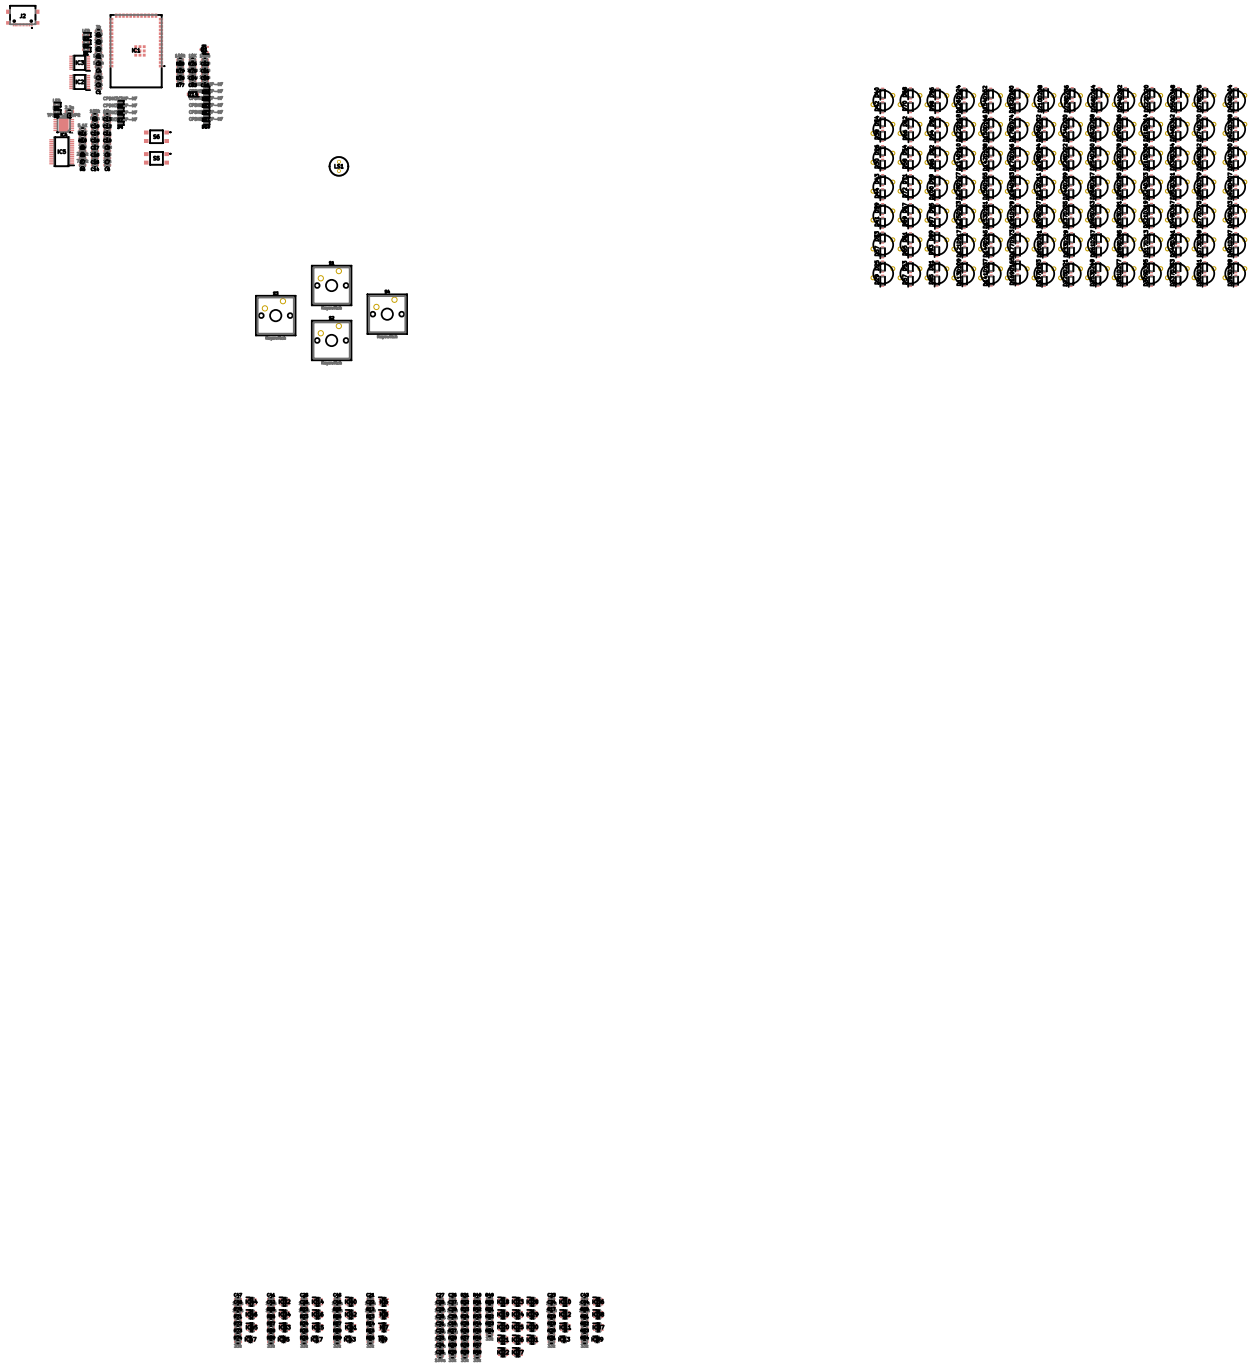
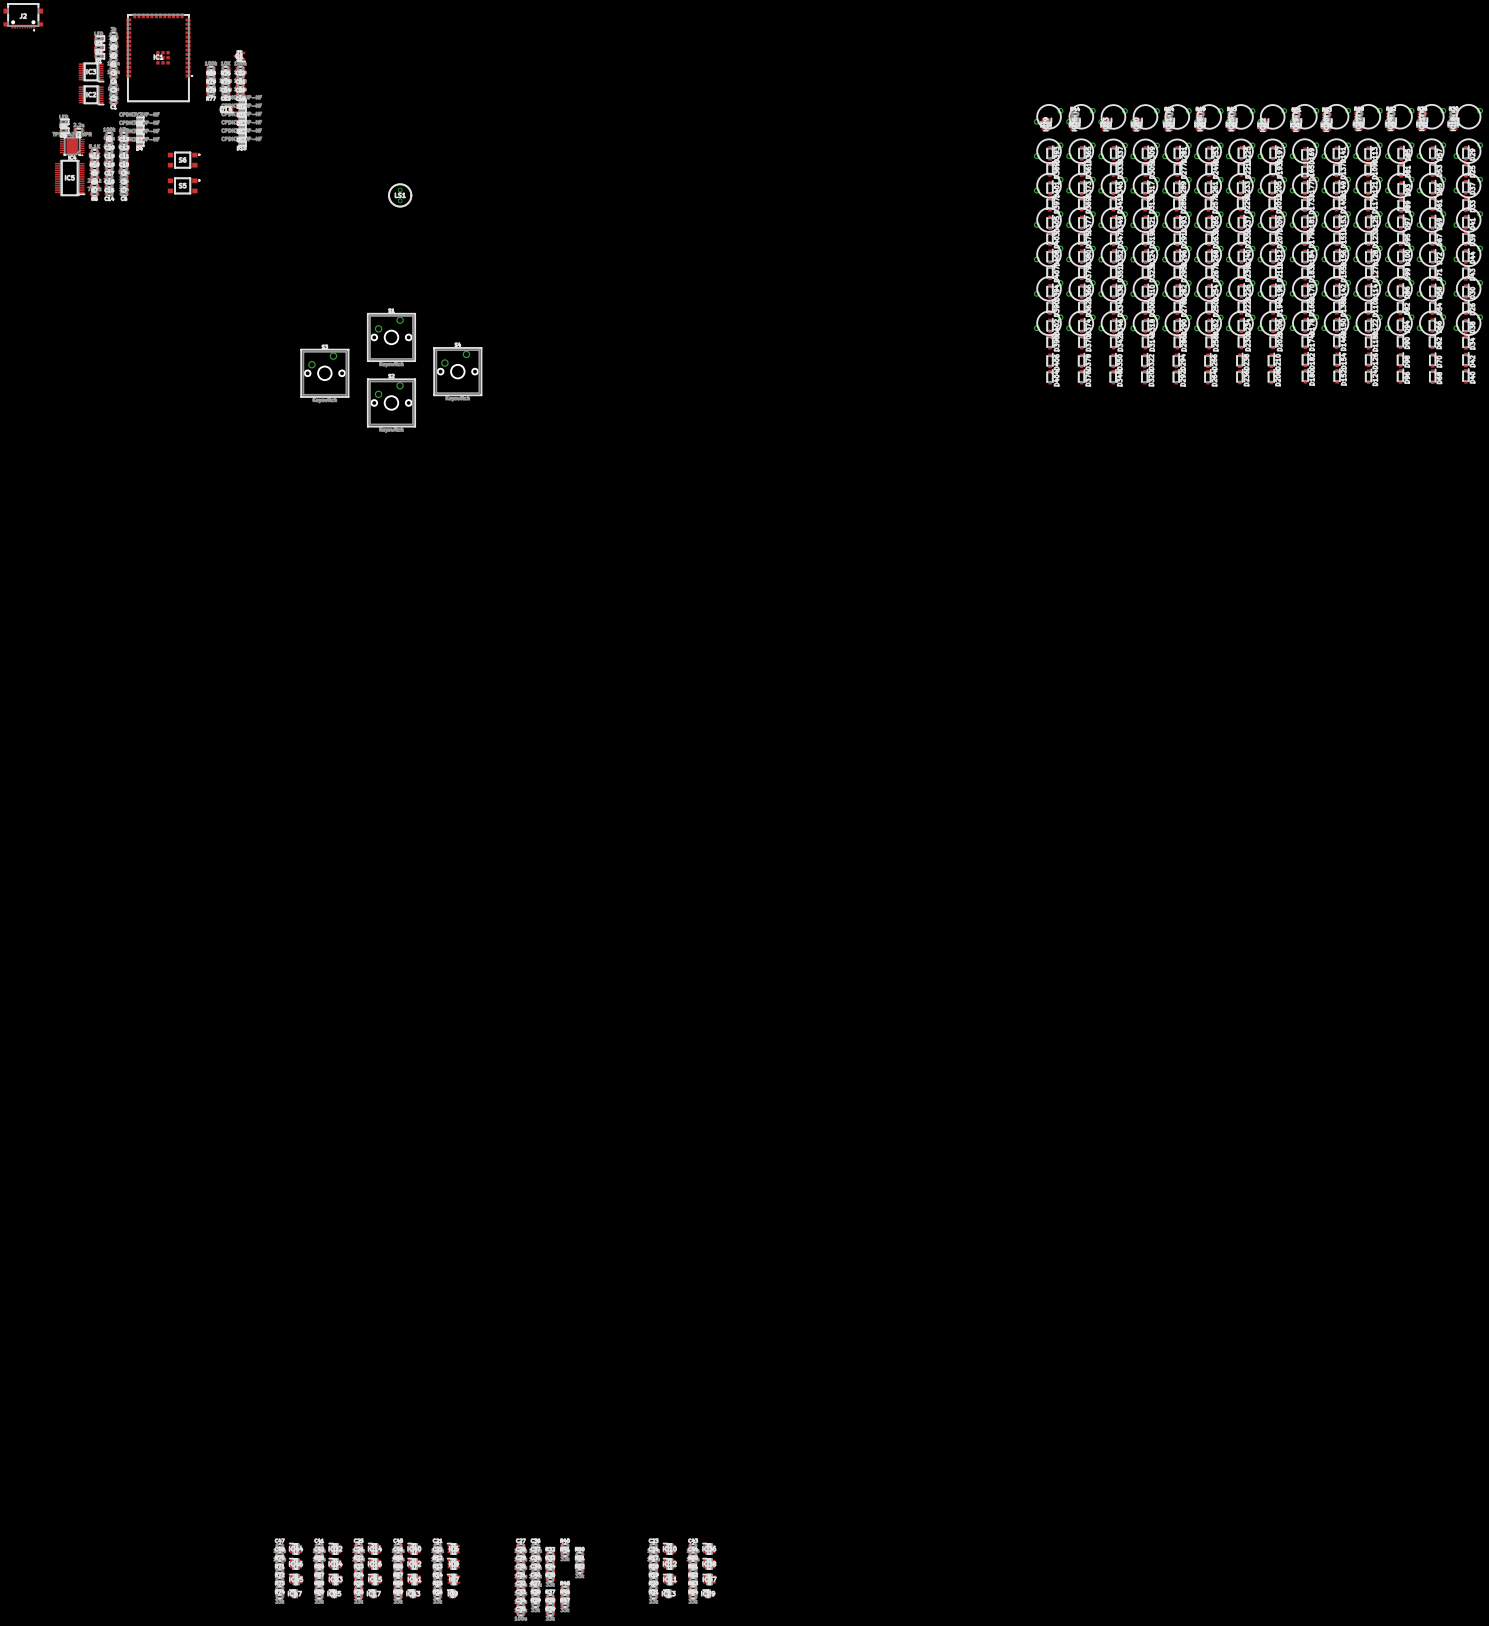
part rotation: 0° (882, 93) -> 180° (1465, 376)
part position: (882, 93) -> (1465, 376)
part rotation: 0° (910, 93) -> 180° (1432, 376)
part position: (910, 93) -> (1432, 376)
part rotation: 0° (937, 93) -> 180° (1400, 376)
part position: (937, 93) -> (1400, 376)
part rotation: 0° (964, 93) -> 180° (1368, 376)
part position: (964, 93) -> (1368, 376)
part rotation: 0° (990, 93) -> 180° (1337, 376)
part position: (990, 93) -> (1337, 376)
part rotation: 0° (1017, 93) -> 180° (1305, 376)
part position: (1017, 93) -> (1305, 376)
part rotation: 0° (1045, 93) -> 180° (1271, 376)
part position: (1045, 93) -> (1271, 376)
part rotation: 0° (1072, 93) -> 180° (1239, 376)
part position: (1072, 93) -> (1239, 376)
part rotation: 0° (1099, 93) -> 180° (1207, 377)
part position: (1099, 93) -> (1207, 377)
part rotation: 0° (1125, 93) -> 180° (1176, 377)
part position: (1125, 93) -> (1176, 377)
part rotation: 0° (1152, 93) -> 180° (1144, 377)
part position: (1152, 93) -> (1144, 377)
part rotation: 0° (1178, 93) -> 180° (1113, 377)
part position: (1178, 93) -> (1113, 377)
part rotation: 0° (1205, 93) -> 180° (1081, 377)
part position: (1205, 93) -> (1081, 377)
part rotation: 0° (1235, 93) -> 180° (1050, 377)
part position: (1235, 93) -> (1050, 377)
part rotation: 0° (1045, 106) -> 180° (1271, 360)
part position: (1045, 106) -> (1271, 360)
part rotation: 0° (1072, 106) -> 180° (1239, 360)
part position: (1072, 106) -> (1239, 360)
part rotation: 0° (1099, 106) -> 180° (1207, 360)
part position: (1099, 106) -> (1207, 360)
part rotation: 0° (1125, 106) -> 180° (1176, 360)
part position: (1125, 106) -> (1176, 360)
part rotation: 0° (1152, 106) -> 180° (1144, 360)
part position: (1152, 106) -> (1144, 360)
part rotation: 0° (1178, 106) -> 180° (1113, 360)
part position: (1178, 106) -> (1113, 360)
part rotation: 0° (1205, 106) -> 180° (1081, 360)
part position: (1205, 106) -> (1081, 360)
part rotation: 0° (1235, 106) -> 180° (1050, 360)
part position: (1235, 106) -> (1050, 360)
part rotation: 0° (882, 107) -> 180° (1465, 359)
part position: (882, 107) -> (1465, 359)
part rotation: 0° (910, 107) -> 180° (1432, 360)
part position: (910, 107) -> (1432, 360)
part rotation: 0° (937, 107) -> 180° (1400, 360)
part position: (937, 107) -> (1400, 360)
part rotation: 0° (964, 107) -> 180° (1368, 359)
part position: (964, 107) -> (1368, 359)
part rotation: 0° (990, 107) -> 180° (1337, 359)
part position: (990, 107) -> (1337, 359)
part rotation: 0° (1017, 107) -> 180° (1305, 359)
part position: (1017, 107) -> (1305, 359)
part rotation: 0° (882, 122) -> 180° (1465, 342)
part position: (882, 122) -> (1465, 342)
part rotation: 0° (910, 122) -> 180° (1432, 341)
part position: (910, 122) -> (1432, 341)
part rotation: 0° (937, 122) -> 180° (1400, 341)
part position: (937, 122) -> (1400, 341)
part rotation: 0° (964, 122) -> 180° (1368, 342)
part position: (964, 122) -> (1368, 342)
part rotation: 0° (990, 122) -> 180° (1336, 341)
part position: (990, 122) -> (1336, 341)
part rotation: 0° (1017, 122) -> 180° (1305, 341)
part position: (1017, 122) -> (1305, 341)
part rotation: 0° (1044, 122) -> 180° (1273, 341)
part position: (1044, 122) -> (1273, 341)
part rotation: 0° (1071, 122) -> 180° (1241, 341)
part position: (1071, 122) -> (1241, 341)
part rotation: 0° (1098, 122) -> 180° (1209, 342)
part position: (1098, 122) -> (1209, 342)
part rotation: 0° (1124, 122) -> 180° (1177, 342)
part position: (1124, 122) -> (1177, 342)
part rotation: 0° (1151, 122) -> 180° (1145, 342)
part position: (1151, 122) -> (1145, 342)
part rotation: 0° (1178, 122) -> 180° (1113, 342)
part position: (1178, 122) -> (1113, 342)
part rotation: 0° (1204, 122) -> 180° (1081, 342)
part position: (1204, 122) -> (1081, 342)
part rotation: 0° (1235, 122) -> 180° (1050, 342)
part position: (1235, 122) -> (1050, 342)
part rotation: 0° (882, 135) -> 180° (1465, 325)
part position: (882, 135) -> (1465, 325)
part rotation: 0° (910, 136) -> 180° (1432, 325)
part position: (910, 136) -> (1432, 325)
part rotation: 0° (937, 136) -> 180° (1400, 325)
part position: (937, 136) -> (1400, 325)
part rotation: 0° (964, 136) -> 180° (1368, 325)
part position: (964, 136) -> (1368, 325)
part rotation: 0° (990, 136) -> 180° (1336, 325)
part position: (990, 136) -> (1336, 325)
part rotation: 0° (1017, 136) -> 180° (1305, 325)
part position: (1017, 136) -> (1305, 325)
part rotation: 0° (1044, 136) -> 180° (1273, 325)
part position: (1044, 136) -> (1273, 325)
part rotation: 0° (1071, 136) -> 180° (1241, 325)
part position: (1071, 136) -> (1241, 325)
part rotation: 0° (1098, 136) -> 180° (1209, 325)
part position: (1098, 136) -> (1209, 325)
part rotation: 0° (1124, 136) -> 180° (1177, 325)
part position: (1124, 136) -> (1177, 325)
part rotation: 0° (1151, 136) -> 180° (1145, 325)
part position: (1151, 136) -> (1145, 325)
part rotation: 0° (1178, 136) -> 180° (1113, 325)
part position: (1178, 136) -> (1113, 325)
part rotation: 0° (1204, 136) -> 180° (1081, 325)
part position: (1204, 136) -> (1081, 325)
part rotation: 0° (1235, 136) -> 180° (1050, 325)
part position: (1235, 136) -> (1050, 325)
part rotation: 0° (882, 151) -> 180° (1465, 307)
part position: (882, 151) -> (1465, 307)
part rotation: 0° (910, 151) -> 180° (1432, 307)
part position: (910, 151) -> (1432, 307)
part rotation: 0° (937, 151) -> 180° (1400, 307)
part position: (937, 151) -> (1400, 307)
part rotation: 0° (964, 151) -> 180° (1368, 307)
part position: (964, 151) -> (1368, 307)
part rotation: 0° (990, 151) -> 180° (1336, 307)
part position: (990, 151) -> (1336, 307)
part rotation: 0° (1017, 151) -> 180° (1305, 306)
part position: (1017, 151) -> (1305, 306)
part rotation: 0° (1044, 151) -> 180° (1273, 307)
part position: (1044, 151) -> (1273, 307)
part rotation: 0° (1071, 151) -> 180° (1241, 307)
part position: (1071, 151) -> (1241, 307)
part rotation: 0° (1098, 151) -> 180° (1209, 307)
part position: (1098, 151) -> (1209, 307)
part rotation: 0° (1124, 151) -> 180° (1177, 307)
part position: (1124, 151) -> (1177, 307)
part rotation: 0° (1151, 151) -> 180° (1145, 307)
part position: (1151, 151) -> (1145, 307)
part rotation: 0° (1178, 151) -> 180° (1113, 307)
part position: (1178, 151) -> (1113, 307)
part rotation: 0° (1204, 151) -> 180° (1081, 307)
part position: (1204, 151) -> (1081, 307)
part rotation: 0° (1235, 151) -> 180° (1050, 307)
part position: (1235, 151) -> (1050, 307)
part rotation: 0° (882, 164) -> 180° (1465, 291)
part position: (882, 164) -> (1465, 291)
part rotation: 0° (910, 165) -> 180° (1432, 291)
part position: (910, 165) -> (1432, 291)
part rotation: 0° (937, 165) -> 180° (1400, 290)
part position: (937, 165) -> (1400, 290)
part rotation: 0° (964, 165) -> 180° (1368, 290)
part position: (964, 165) -> (1368, 290)
part rotation: 0° (990, 165) -> 180° (1336, 290)
part position: (990, 165) -> (1336, 290)
part rotation: 0° (1017, 165) -> 180° (1305, 290)
part position: (1017, 165) -> (1305, 290)
part rotation: 0° (1044, 165) -> 180° (1273, 291)
part position: (1044, 165) -> (1273, 291)
part rotation: 0° (1071, 165) -> 180° (1241, 291)
part position: (1071, 165) -> (1241, 291)
part rotation: 0° (1098, 165) -> 180° (1209, 291)
part position: (1098, 165) -> (1209, 291)
part rotation: 0° (1124, 165) -> 180° (1177, 291)
part position: (1124, 165) -> (1177, 291)
part rotation: 0° (1151, 165) -> 180° (1145, 291)
part position: (1151, 165) -> (1145, 291)
part rotation: 0° (1178, 165) -> 180° (1113, 291)
part position: (1178, 165) -> (1113, 291)
part rotation: 0° (1204, 165) -> 180° (1081, 291)
part position: (1204, 165) -> (1081, 291)
part rotation: 0° (1235, 165) -> 180° (1050, 291)
part position: (1235, 165) -> (1050, 291)
part rotation: 0° (882, 180) -> 180° (1465, 273)
part position: (882, 180) -> (1465, 273)
part rotation: 0° (910, 180) -> 180° (1432, 273)
part position: (910, 180) -> (1432, 273)
part rotation: 0° (937, 180) -> 180° (1400, 272)
part position: (937, 180) -> (1400, 272)
part rotation: 0° (964, 180) -> 180° (1368, 272)
part position: (964, 180) -> (1368, 272)
part rotation: 0° (990, 180) -> 180° (1336, 272)
part position: (990, 180) -> (1336, 272)
part rotation: 0° (1017, 180) -> 180° (1305, 273)
part position: (1017, 180) -> (1305, 273)
part rotation: 0° (1044, 180) -> 180° (1273, 272)
part position: (1044, 180) -> (1273, 272)
part rotation: 0° (1071, 180) -> 180° (1241, 272)
part position: (1071, 180) -> (1241, 272)
part rotation: 0° (1098, 180) -> 180° (1209, 272)
part position: (1098, 180) -> (1209, 272)
part rotation: 0° (1124, 180) -> 180° (1177, 272)
part position: (1124, 180) -> (1177, 272)
part rotation: 0° (1151, 180) -> 180° (1145, 272)
part position: (1151, 180) -> (1145, 272)
part rotation: 0° (1178, 180) -> 180° (1113, 272)
part position: (1178, 180) -> (1113, 272)
part rotation: 0° (1204, 180) -> 180° (1081, 272)
part position: (1204, 180) -> (1081, 272)
part rotation: 0° (1235, 180) -> 180° (1050, 272)
part position: (1235, 180) -> (1050, 272)
part rotation: 0° (910, 193) -> 180° (1432, 256)
part position: (910, 193) -> (1432, 256)
part rotation: 0° (882, 194) -> 180° (1465, 256)
part position: (882, 194) -> (1465, 256)
part rotation: 0° (937, 194) -> 180° (1400, 256)
part position: (937, 194) -> (1400, 256)
part rotation: 0° (964, 194) -> 180° (1368, 256)
part position: (964, 194) -> (1368, 256)
part rotation: 0° (990, 194) -> 180° (1336, 256)
part position: (990, 194) -> (1336, 256)
part rotation: 0° (1017, 194) -> 180° (1305, 256)
part position: (1017, 194) -> (1305, 256)
part rotation: 0° (1044, 194) -> 180° (1273, 256)
part position: (1044, 194) -> (1273, 256)
part rotation: 0° (1071, 194) -> 180° (1241, 256)
part position: (1071, 194) -> (1241, 256)
part rotation: 0° (1098, 194) -> 180° (1209, 256)
part position: (1098, 194) -> (1209, 256)
part rotation: 0° (1124, 194) -> 180° (1177, 256)
part position: (1124, 194) -> (1177, 256)
part rotation: 0° (1151, 194) -> 180° (1145, 256)
part position: (1151, 194) -> (1145, 256)
part rotation: 0° (1178, 194) -> 180° (1113, 256)
part position: (1178, 194) -> (1113, 256)
part rotation: 0° (1204, 194) -> 180° (1081, 256)
part position: (1204, 194) -> (1081, 256)
part rotation: 0° (1235, 194) -> 180° (1050, 256)
part position: (1235, 194) -> (1050, 256)
part rotation: 0° (882, 209) -> 180° (1465, 238)
part position: (882, 209) -> (1465, 238)
part rotation: 0° (910, 209) -> 180° (1432, 238)
part position: (910, 209) -> (1432, 238)
part rotation: 0° (937, 209) -> 180° (1400, 238)
part position: (937, 209) -> (1400, 238)
part rotation: 0° (964, 209) -> 180° (1368, 238)
part position: (964, 209) -> (1368, 238)
part rotation: 0° (990, 209) -> 180° (1336, 238)
part position: (990, 209) -> (1336, 238)
part rotation: 0° (1017, 209) -> 180° (1304, 238)
part position: (1017, 209) -> (1304, 238)
part rotation: 0° (1044, 209) -> 180° (1273, 238)
part position: (1044, 209) -> (1273, 238)
part rotation: 0° (1071, 209) -> 180° (1241, 238)
part position: (1071, 209) -> (1241, 238)
part rotation: 0° (1098, 209) -> 180° (1209, 238)
part position: (1098, 209) -> (1209, 238)
part rotation: 0° (1124, 209) -> 180° (1177, 238)
part position: (1124, 209) -> (1177, 238)
part rotation: 0° (1151, 209) -> 180° (1145, 238)
part position: (1151, 209) -> (1145, 238)
part rotation: 0° (1178, 209) -> 180° (1113, 238)
part position: (1178, 209) -> (1113, 238)
part rotation: 0° (1204, 209) -> 180° (1081, 238)
part position: (1204, 209) -> (1081, 238)
part rotation: 0° (1235, 209) -> 180° (1050, 238)
part position: (1235, 209) -> (1050, 238)
part rotation: 0° (882, 222) -> 180° (1465, 222)
part position: (882, 222) -> (1465, 222)
part rotation: 0° (910, 222) -> 180° (1432, 222)
part position: (910, 222) -> (1432, 222)
part rotation: 0° (1044, 222) -> 180° (1273, 222)
part position: (1044, 222) -> (1273, 222)
part rotation: 0° (1071, 222) -> 180° (1241, 222)
part position: (1071, 222) -> (1241, 222)
part rotation: 0° (1098, 222) -> 180° (1209, 222)
part position: (1098, 222) -> (1209, 222)
part rotation: 0° (1124, 222) -> 180° (1177, 222)
part position: (1124, 222) -> (1177, 222)
part rotation: 0° (1151, 222) -> 180° (1145, 222)
part position: (1151, 222) -> (1145, 222)
part rotation: 0° (1178, 222) -> 180° (1113, 222)
part position: (1178, 222) -> (1113, 222)
part rotation: 0° (1204, 222) -> 180° (1081, 222)
part position: (1204, 222) -> (1081, 222)
part rotation: 0° (1235, 222) -> 180° (1050, 222)
part position: (1235, 222) -> (1050, 222)
part rotation: 0° (937, 223) -> 180° (1400, 222)
part position: (937, 223) -> (1400, 222)
part rotation: 0° (964, 223) -> 180° (1368, 222)
part position: (964, 223) -> (1368, 222)
part rotation: 0° (990, 223) -> 180° (1336, 222)
part position: (990, 223) -> (1336, 222)
part rotation: 0° (1017, 223) -> 180° (1304, 222)
part position: (1017, 223) -> (1304, 222)
part rotation: 0° (882, 237) -> 180° (1465, 204)
part position: (882, 237) -> (1465, 204)
part rotation: 0° (936, 237) -> 180° (1401, 205)
part position: (936, 237) -> (1401, 205)
part rotation: 0° (1017, 237) -> 180° (1304, 204)
part position: (1017, 237) -> (1304, 204)
part rotation: 0° (910, 238) -> 180° (1432, 203)
part position: (910, 238) -> (1432, 203)
part rotation: 0° (964, 238) -> 180° (1368, 204)
part position: (964, 238) -> (1368, 204)
part rotation: 0° (991, 238) -> 180° (1336, 203)
part position: (991, 238) -> (1336, 203)
part rotation: 0° (1045, 238) -> 180° (1272, 203)
part position: (1045, 238) -> (1272, 203)
part rotation: 0° (1071, 238) -> 180° (1240, 203)
part position: (1071, 238) -> (1240, 203)
part rotation: 0° (1098, 238) -> 180° (1208, 204)
part position: (1098, 238) -> (1208, 204)
part rotation: 0° (1125, 238) -> 180° (1176, 204)
part position: (1125, 238) -> (1176, 204)
part rotation: 0° (1151, 238) -> 180° (1145, 204)
part position: (1151, 238) -> (1145, 204)
part rotation: 0° (1178, 238) -> 180° (1113, 204)
part position: (1178, 238) -> (1113, 204)
part rotation: 0° (1204, 238) -> 180° (1081, 204)
part position: (1204, 238) -> (1081, 204)
part rotation: 0° (1235, 238) -> 180° (1050, 204)
part position: (1235, 238) -> (1050, 204)
part rotation: 0° (910, 251) -> 180° (1432, 187)
part position: (910, 251) -> (1432, 187)
part rotation: 0° (936, 251) -> 180° (1401, 188)
part position: (936, 251) -> (1401, 188)
part rotation: 0° (964, 251) -> 180° (1368, 187)
part position: (964, 251) -> (1368, 187)
part rotation: 0° (991, 251) -> 180° (1336, 187)
part position: (991, 251) -> (1336, 187)
part rotation: 0° (1017, 251) -> 180° (1304, 187)
part position: (1017, 251) -> (1304, 187)
part rotation: 0° (1045, 251) -> 180° (1272, 187)
part position: (1045, 251) -> (1272, 187)
part rotation: 0° (1071, 251) -> 180° (1240, 187)
part position: (1071, 251) -> (1240, 187)
part rotation: 0° (1098, 251) -> 180° (1208, 187)
part position: (1098, 251) -> (1208, 187)
part rotation: 0° (1125, 251) -> 180° (1176, 187)
part position: (1125, 251) -> (1176, 187)
part rotation: 0° (1151, 251) -> 180° (1145, 187)
part position: (1151, 251) -> (1145, 187)
part rotation: 0° (1178, 251) -> 180° (1113, 187)
part position: (1178, 251) -> (1113, 187)
part rotation: 0° (1204, 251) -> 180° (1081, 187)
part position: (1204, 251) -> (1081, 187)
part rotation: 0° (1235, 251) -> 180° (1050, 187)
part position: (1235, 251) -> (1050, 187)
part rotation: 0° (882, 252) -> 180° (1465, 187)
part position: (882, 252) -> (1465, 187)
part rotation: 0° (1017, 265) -> 180° (1304, 171)
part position: (1017, 265) -> (1304, 171)
part rotation: 0° (882, 266) -> 180° (1465, 170)
part position: (882, 266) -> (1465, 170)
part rotation: 0° (936, 266) -> 180° (1401, 170)
part position: (936, 266) -> (1401, 170)
part rotation: 0° (964, 266) -> 180° (1368, 169)
part position: (964, 266) -> (1368, 169)
part rotation: 0° (991, 266) -> 180° (1336, 169)
part position: (991, 266) -> (1336, 169)
part rotation: 0° (910, 267) -> 180° (1432, 169)
part position: (910, 267) -> (1432, 169)
part rotation: 0° (1044, 267) -> 180° (1273, 169)
part position: (1044, 267) -> (1273, 169)
part rotation: 0° (1071, 267) -> 180° (1241, 169)
part position: (1071, 267) -> (1241, 169)
part rotation: 0° (1098, 267) -> 180° (1209, 169)
part position: (1098, 267) -> (1209, 169)
part rotation: 0° (1124, 267) -> 180° (1177, 169)
part position: (1124, 267) -> (1177, 169)
part rotation: 0° (1151, 267) -> 180° (1145, 169)
part position: (1151, 267) -> (1145, 169)
part rotation: 0° (1178, 267) -> 180° (1113, 169)
part position: (1178, 267) -> (1113, 169)
part rotation: 0° (1204, 267) -> 180° (1081, 169)
part position: (1204, 267) -> (1081, 169)
part rotation: 0° (1235, 267) -> 180° (1050, 169)
part position: (1235, 267) -> (1050, 169)
part rotation: 0° (1017, 279) -> 180° (1304, 154)
part position: (1017, 279) -> (1304, 154)
part rotation: 0° (882, 280) -> 180° (1465, 153)
part position: (882, 280) -> (1465, 153)
part rotation: 0° (910, 280) -> 180° (1432, 153)
part position: (910, 280) -> (1432, 153)
part rotation: 0° (936, 280) -> 180° (1401, 153)
part position: (936, 280) -> (1401, 153)
part rotation: 0° (964, 280) -> 180° (1368, 153)
part position: (964, 280) -> (1368, 153)
part rotation: 0° (991, 280) -> 180° (1336, 153)
part position: (991, 280) -> (1336, 153)
part rotation: 0° (1098, 280) -> 180° (1209, 153)
part position: (1098, 280) -> (1209, 153)
part rotation: 0° (1124, 280) -> 180° (1177, 153)
part position: (1124, 280) -> (1177, 153)
part rotation: 0° (1151, 280) -> 180° (1145, 153)
part position: (1151, 280) -> (1145, 153)
part rotation: 0° (1178, 280) -> 180° (1113, 153)
part position: (1178, 280) -> (1113, 153)
part rotation: 0° (1204, 280) -> 180° (1081, 153)
part position: (1204, 280) -> (1081, 153)
part rotation: 0° (1235, 280) -> 180° (1050, 153)
part position: (1235, 280) -> (1050, 153)
part rotation: 0° (1044, 281) -> 180° (1273, 153)
part position: (1044, 281) -> (1273, 153)
part rotation: 0° (1071, 281) -> 180° (1241, 153)
part position: (1071, 281) -> (1241, 153)
part footprint: [512, 1297, 523, 1307] -> [1100, 118, 1112, 131]
part position: (464, 1299) -> (1296, 114)
part position: (489, 1299) -> (1200, 114)
part rotation: 0° (502, 1301) -> 90° clockwise (1453, 124)
part position: (502, 1301) -> (1453, 124)
part rotation: 0° (532, 1301) -> 90° clockwise (1200, 124)
part position: (532, 1301) -> (1200, 124)
part footprint: [497, 1309, 509, 1319] -> [1290, 118, 1302, 132]
part footprint: [512, 1309, 523, 1319] -> [1385, 117, 1397, 131]
part position: (477, 1313) -> (1391, 113)
part rotation: 0° (532, 1314) -> 90° clockwise (1046, 124)
part position: (532, 1314) -> (1046, 124)
part position: (477, 1320) -> (1231, 114)
part footprint: [512, 1322, 523, 1332] -> [1226, 118, 1238, 131]
part footprint: [526, 1322, 538, 1332] -> [1321, 118, 1333, 132]
part rotation: 0° (502, 1326) -> 90° clockwise (1136, 124)
part position: (502, 1326) -> (1136, 124)
part position: (477, 1327) -> (1075, 114)
part position: (489, 1327) -> (1326, 114)
part position: (464, 1334) -> (1422, 113)
part position: (489, 1334) -> (1169, 114)
part footprint: [497, 1334, 509, 1345] -> [1416, 117, 1428, 131]
part footprint: [512, 1334, 523, 1345] -> [1069, 118, 1081, 131]
part footprint: [526, 1334, 538, 1345] -> [1163, 118, 1175, 131]
part footprint: [497, 1347, 509, 1357] -> [1257, 118, 1269, 132]
part footprint: [512, 1347, 523, 1357] -> [1353, 117, 1365, 131]
part position: (452, 1356) -> (1453, 113)
part position: (477, 1356) -> (1358, 113)

